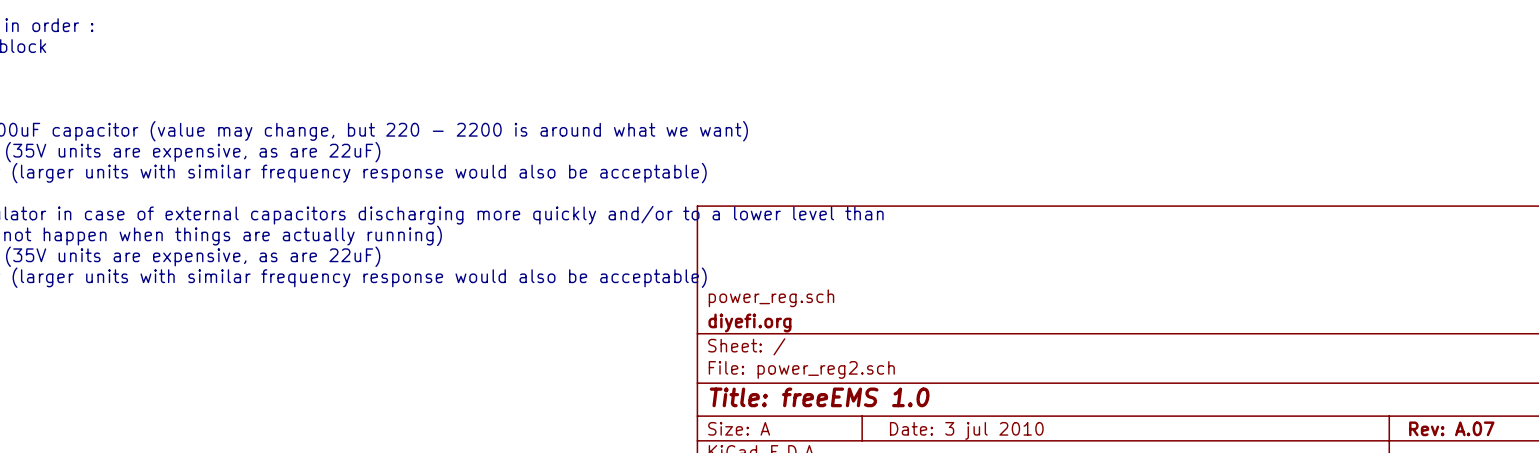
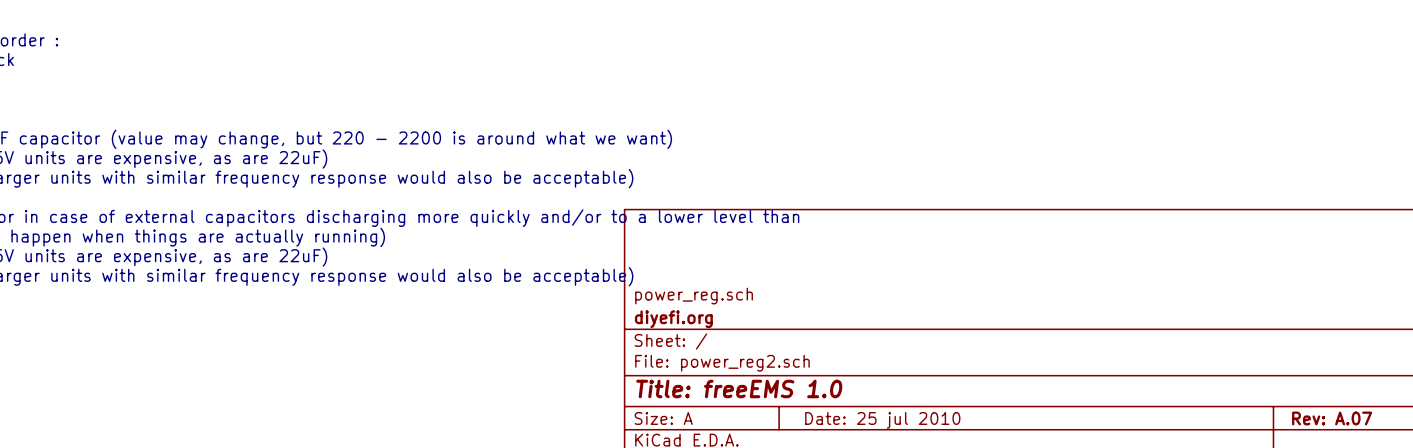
title block: Date: 3 jul 2010 (966, 430) -> Date: 25 jul 2010 (882, 420)

